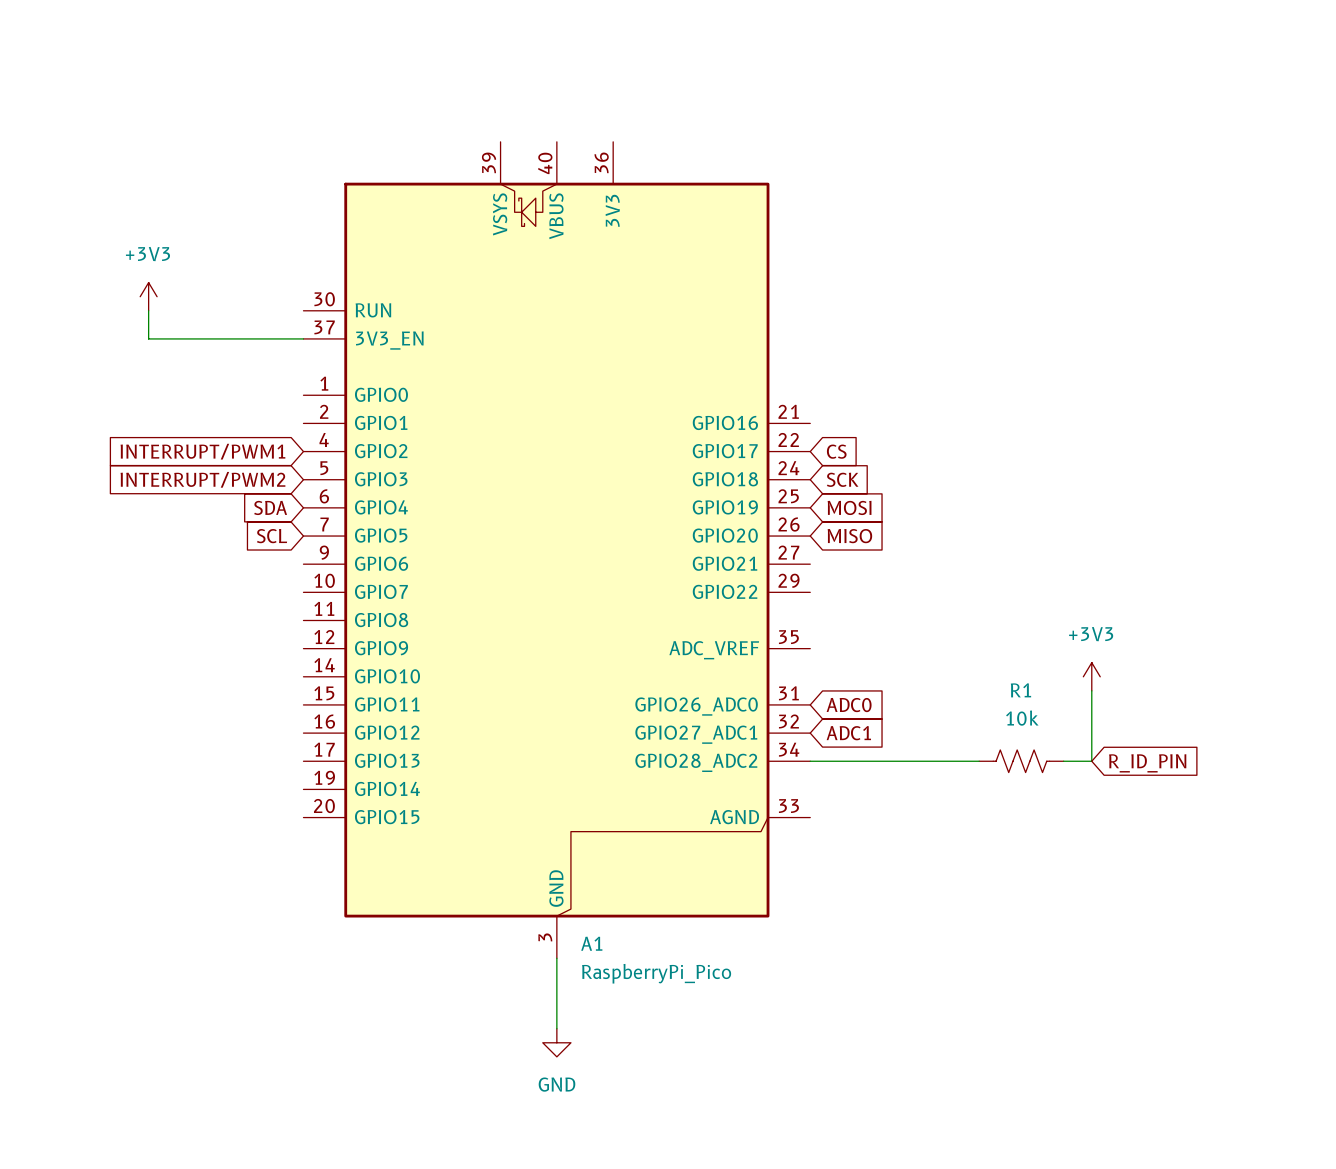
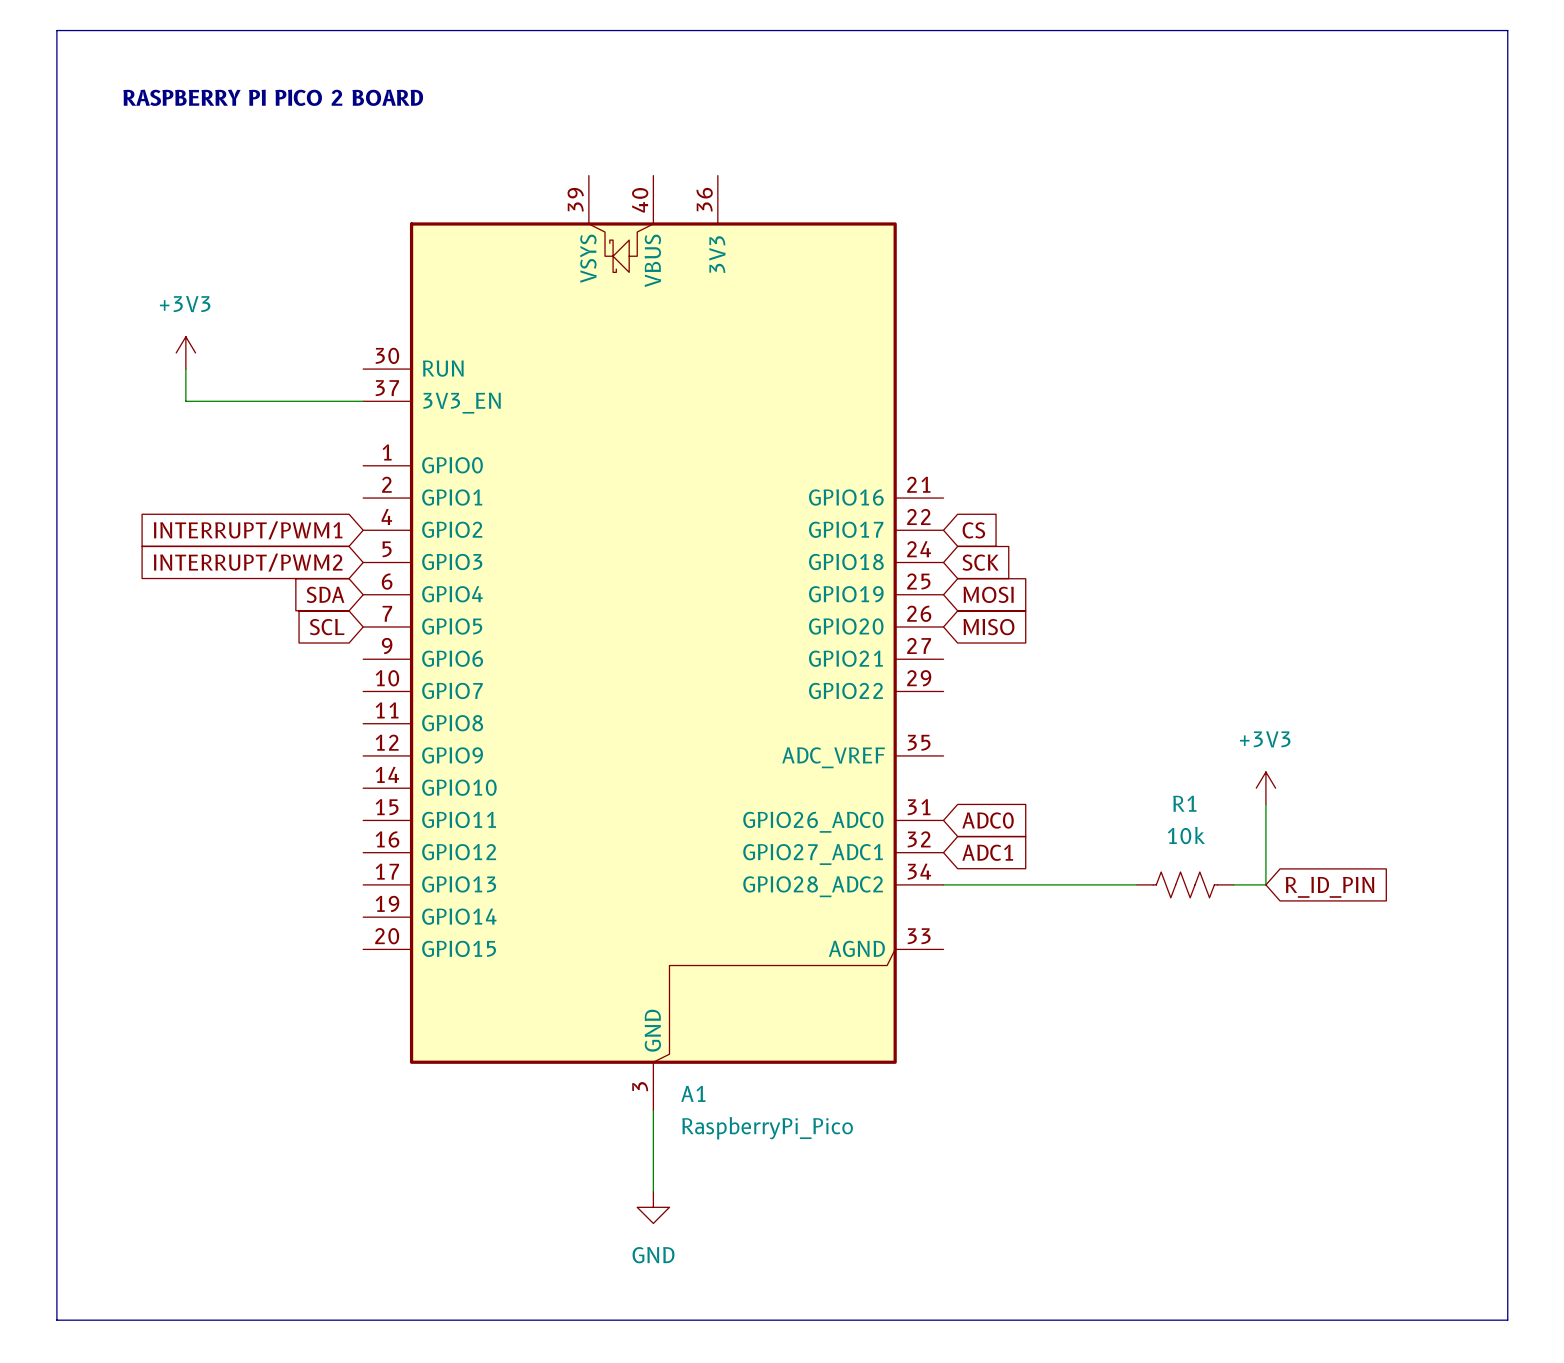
line: none -> (56, 30) (1507, 30) (1507, 1320) (56, 1320) (56, 30)
text: none -> RASPBERRY PI PICO 2 BOARD (273, 97)

